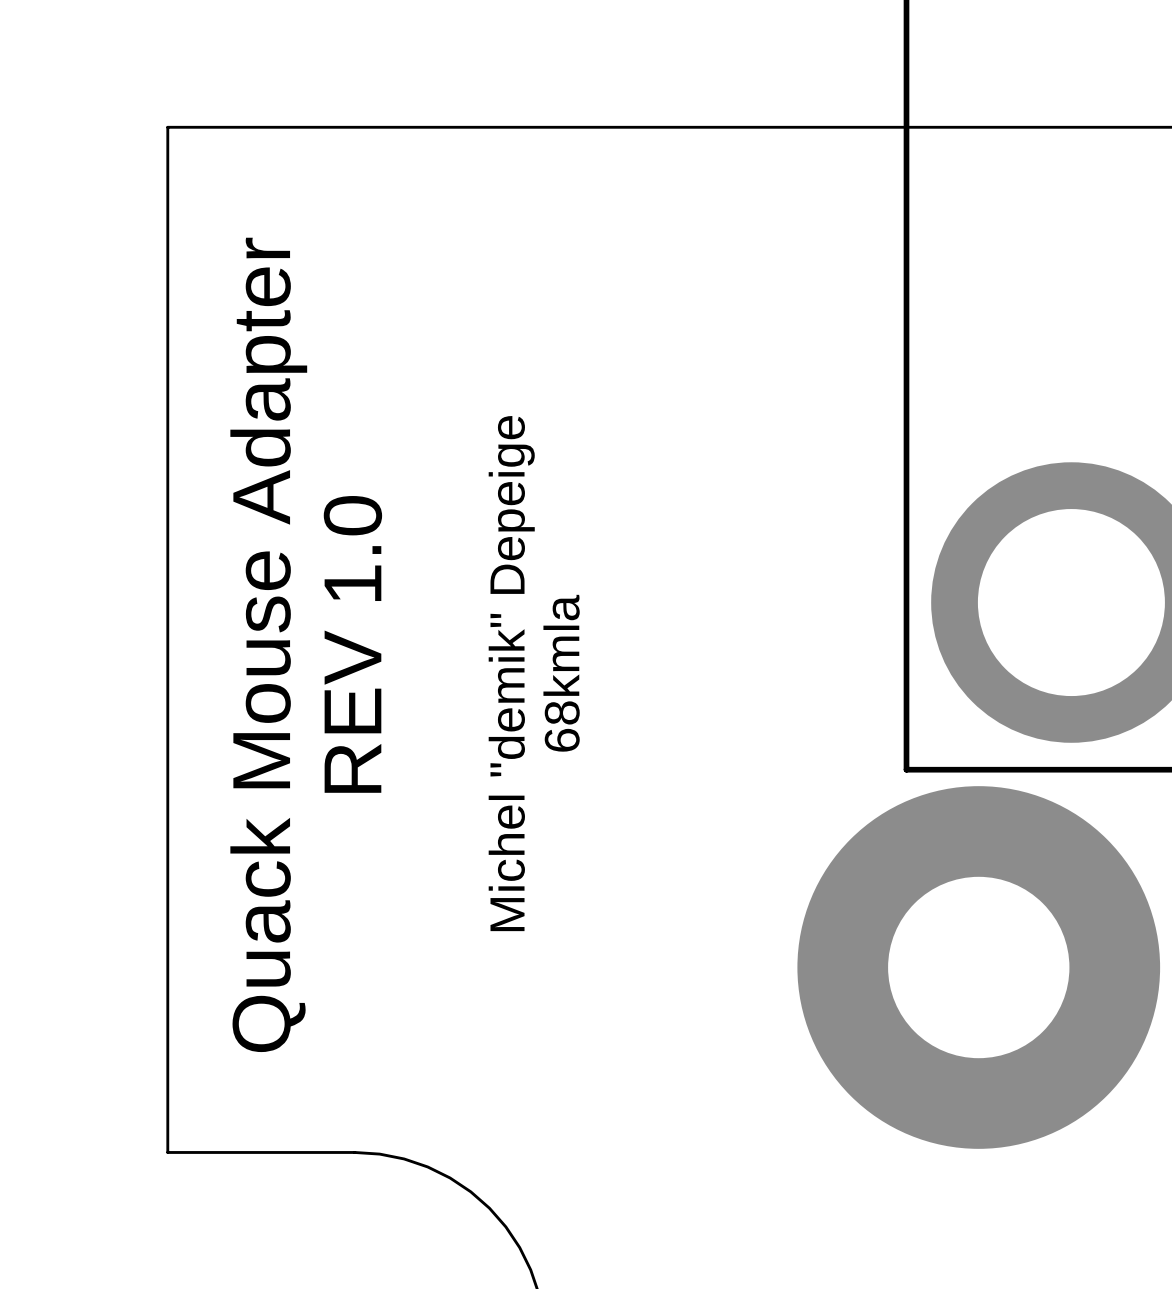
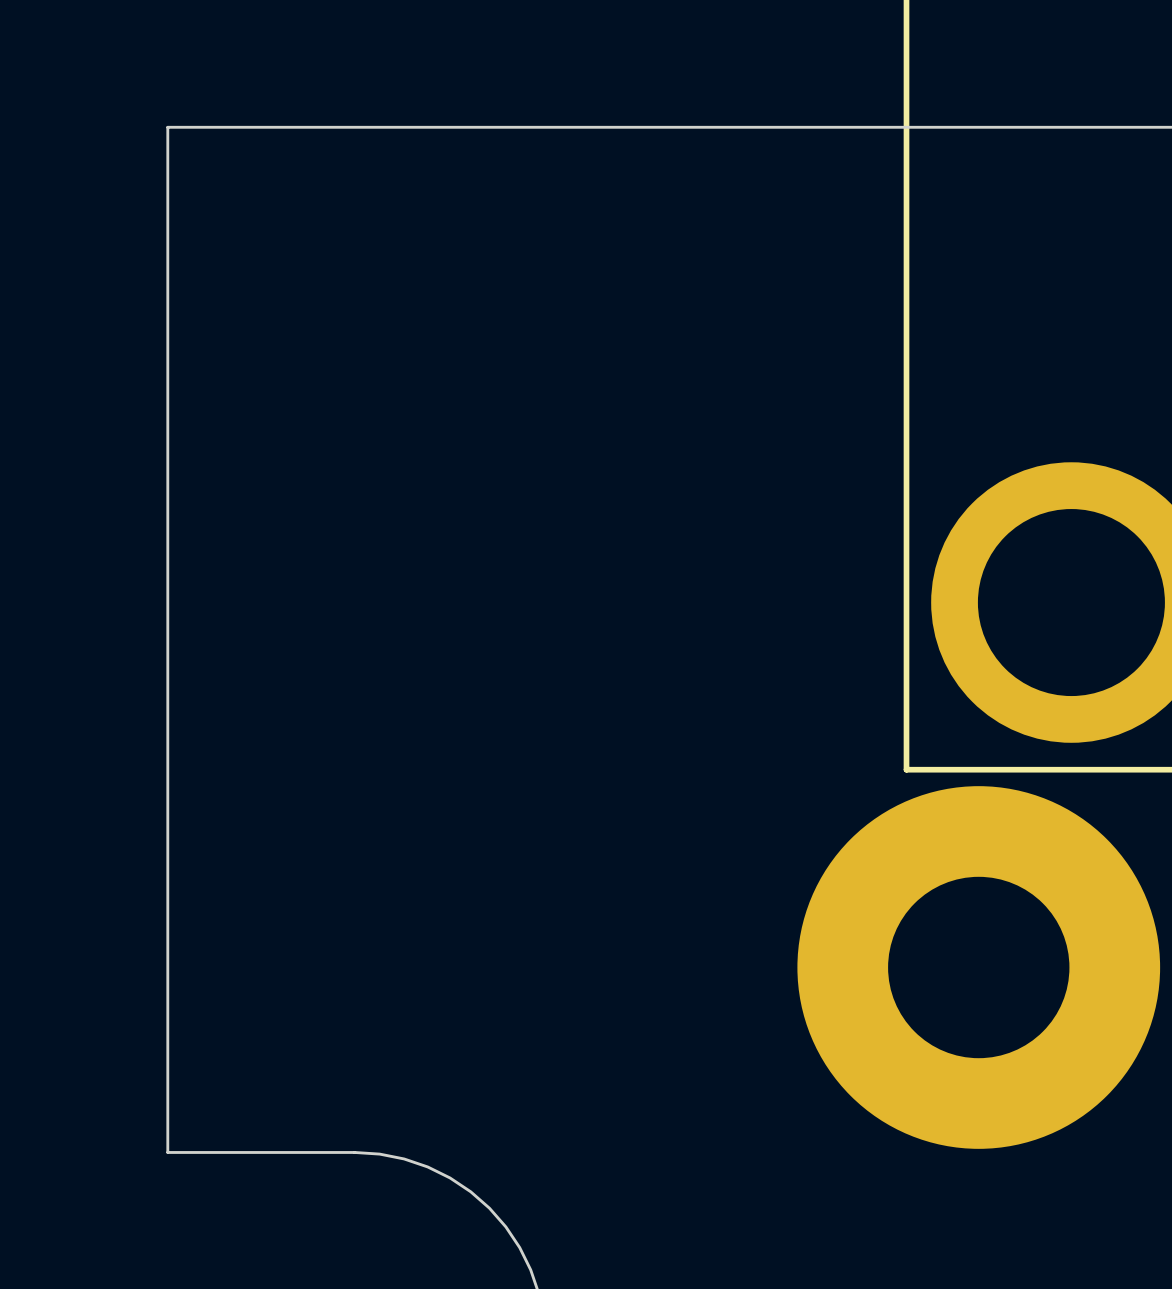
text: Quack Mouse Adapter (268, 644) -> none
text: REV 1.0 (352, 644) -> none
text: Michel "demik" Depeige (511, 673) -> none
text: 68kmla (561, 673) -> none

